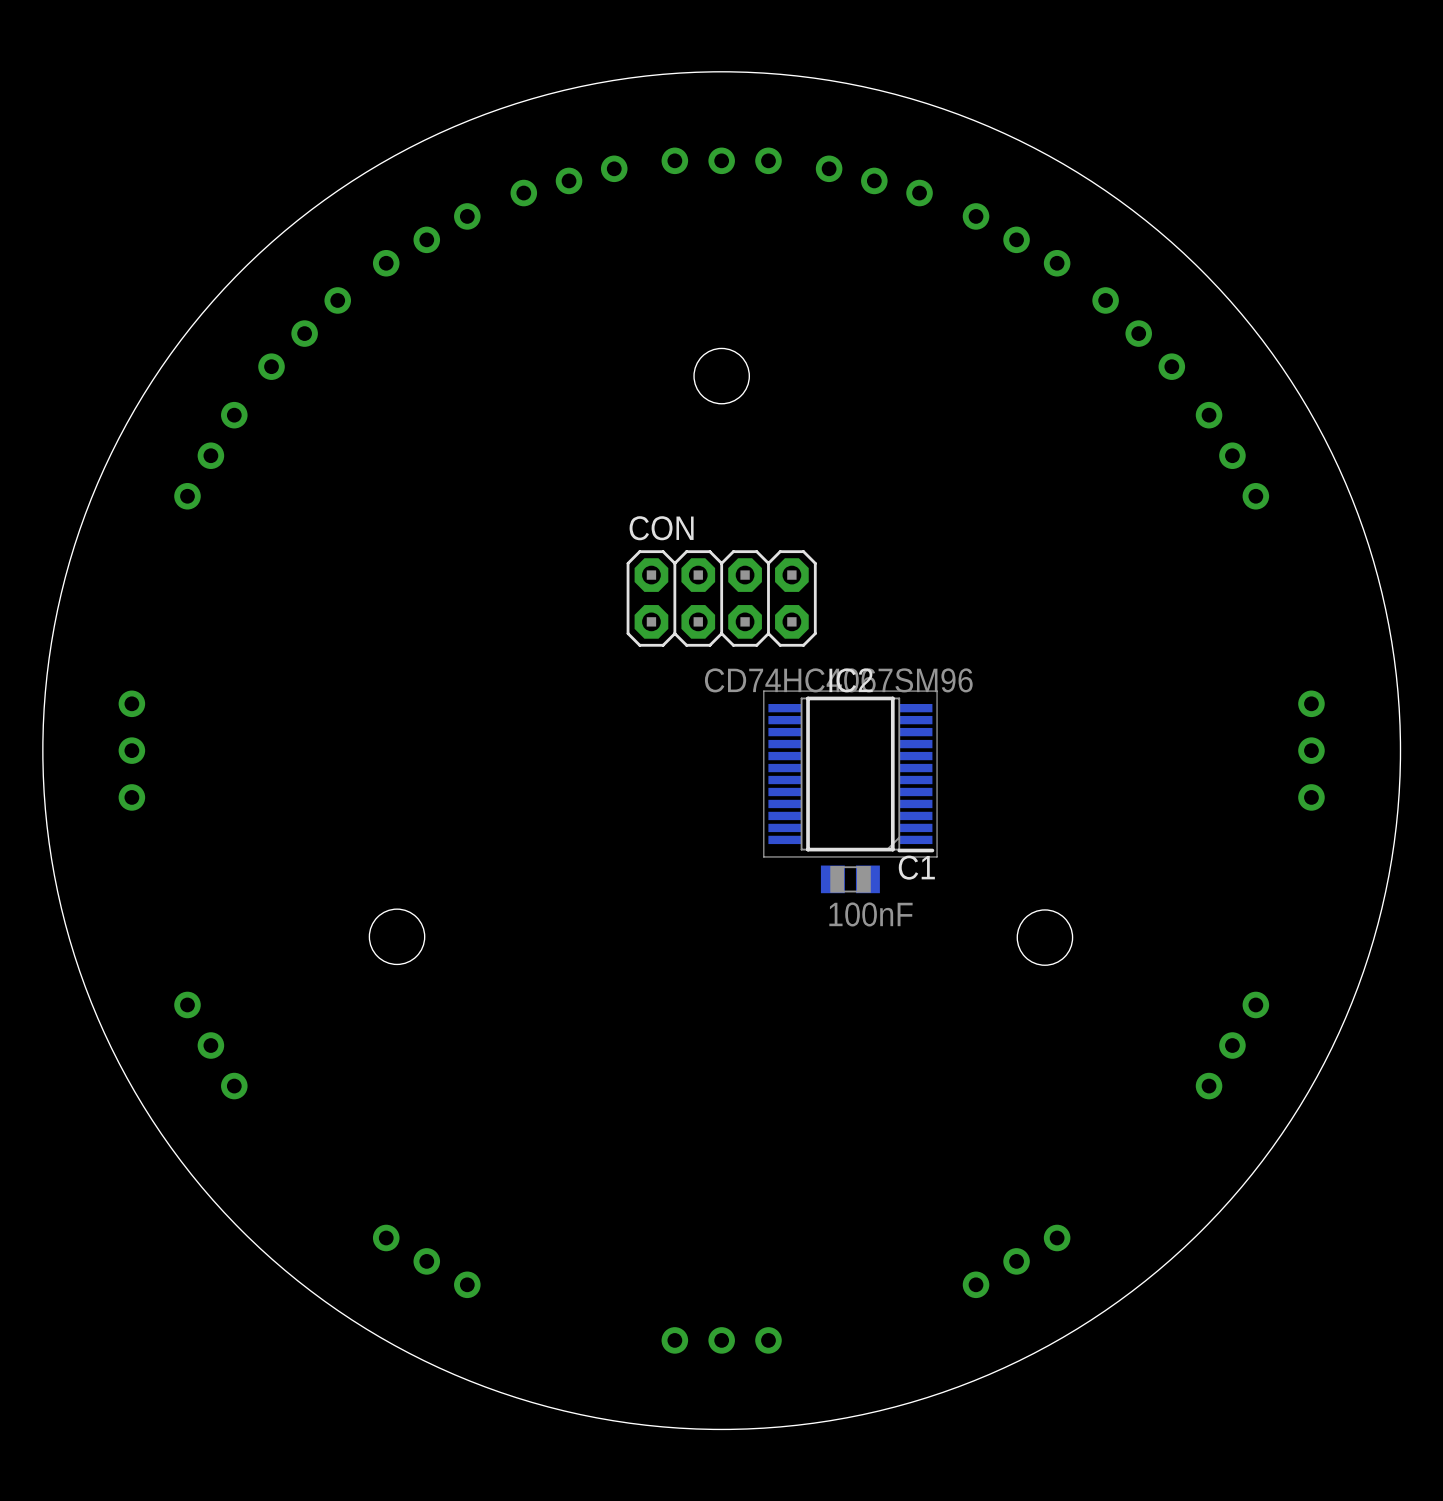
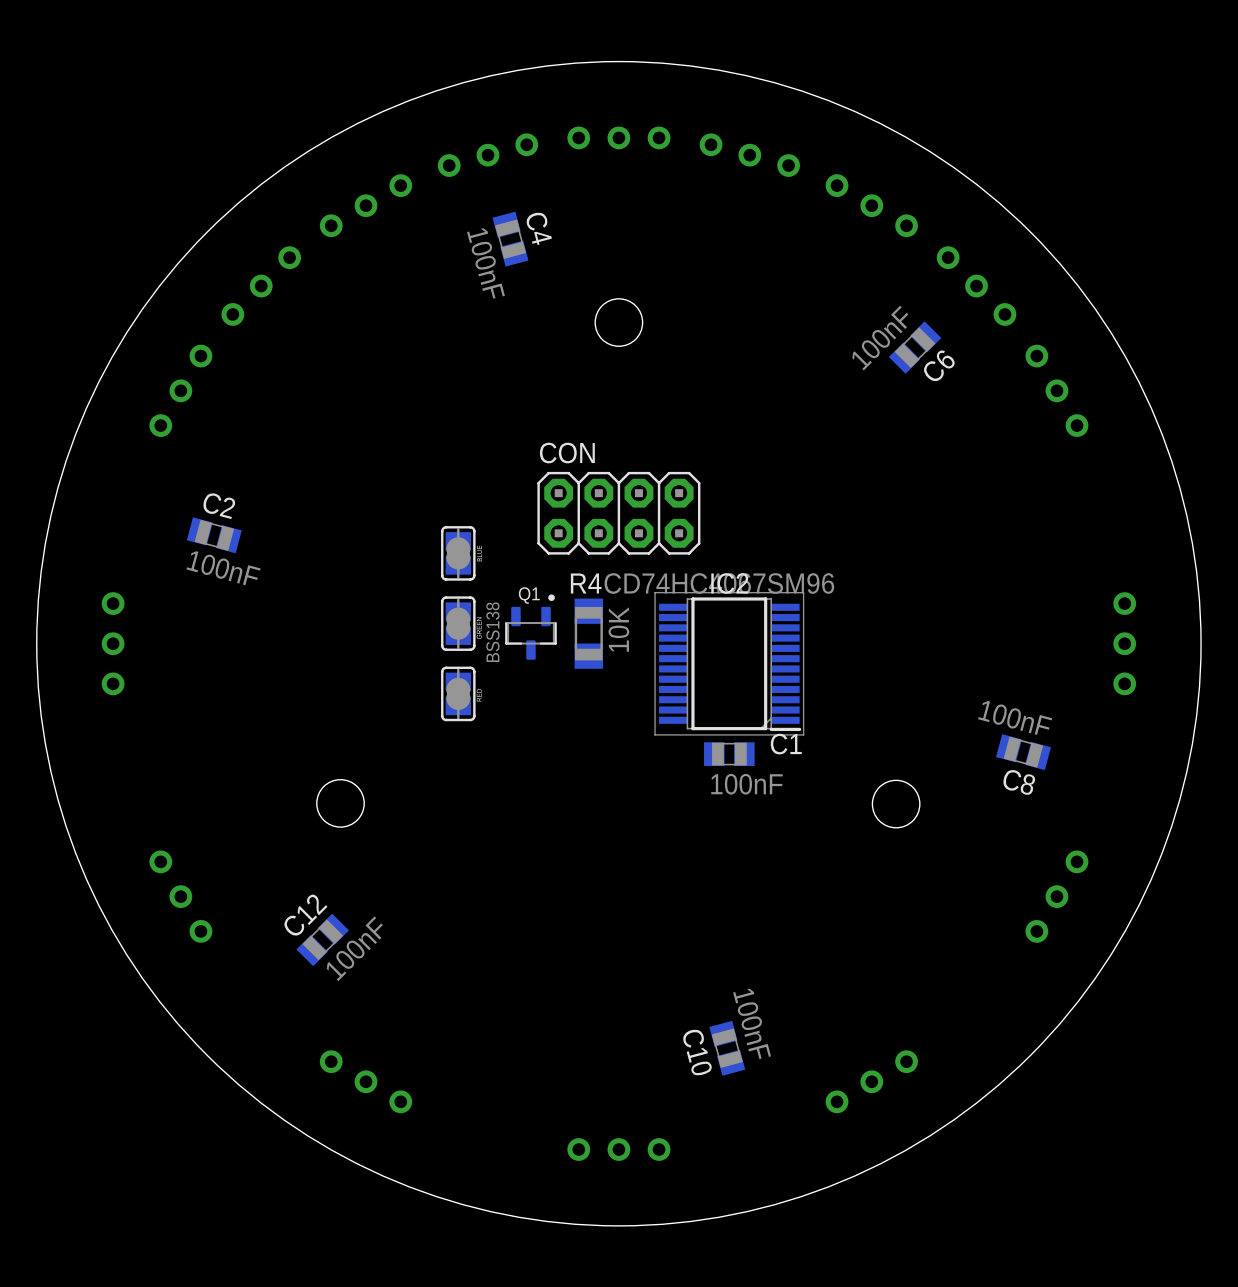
C4: none -> 100nF (510, 239)
C6: none -> 100nF (915, 347)
C2: none -> 100nF (214, 535)
part: none -> (458, 553)
part: none -> (458, 623)
Q1: none -> BSS138 (530, 627)
R4: none -> 10K (588, 633)
part: none -> (458, 693)
C8: none -> 100nF (1023, 752)
C12: none -> 100nF (322, 939)
C10: none -> 100nF (727, 1048)

